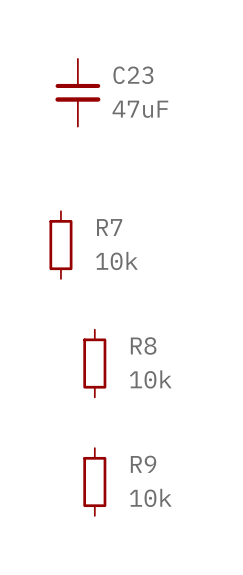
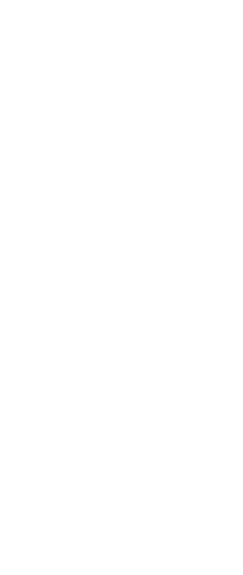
C23: 47uF (77, 92) -> none
R7: 10k (60, 245) -> none
R8: 10k (94, 363) -> none
R9: 10k (94, 482) -> none

